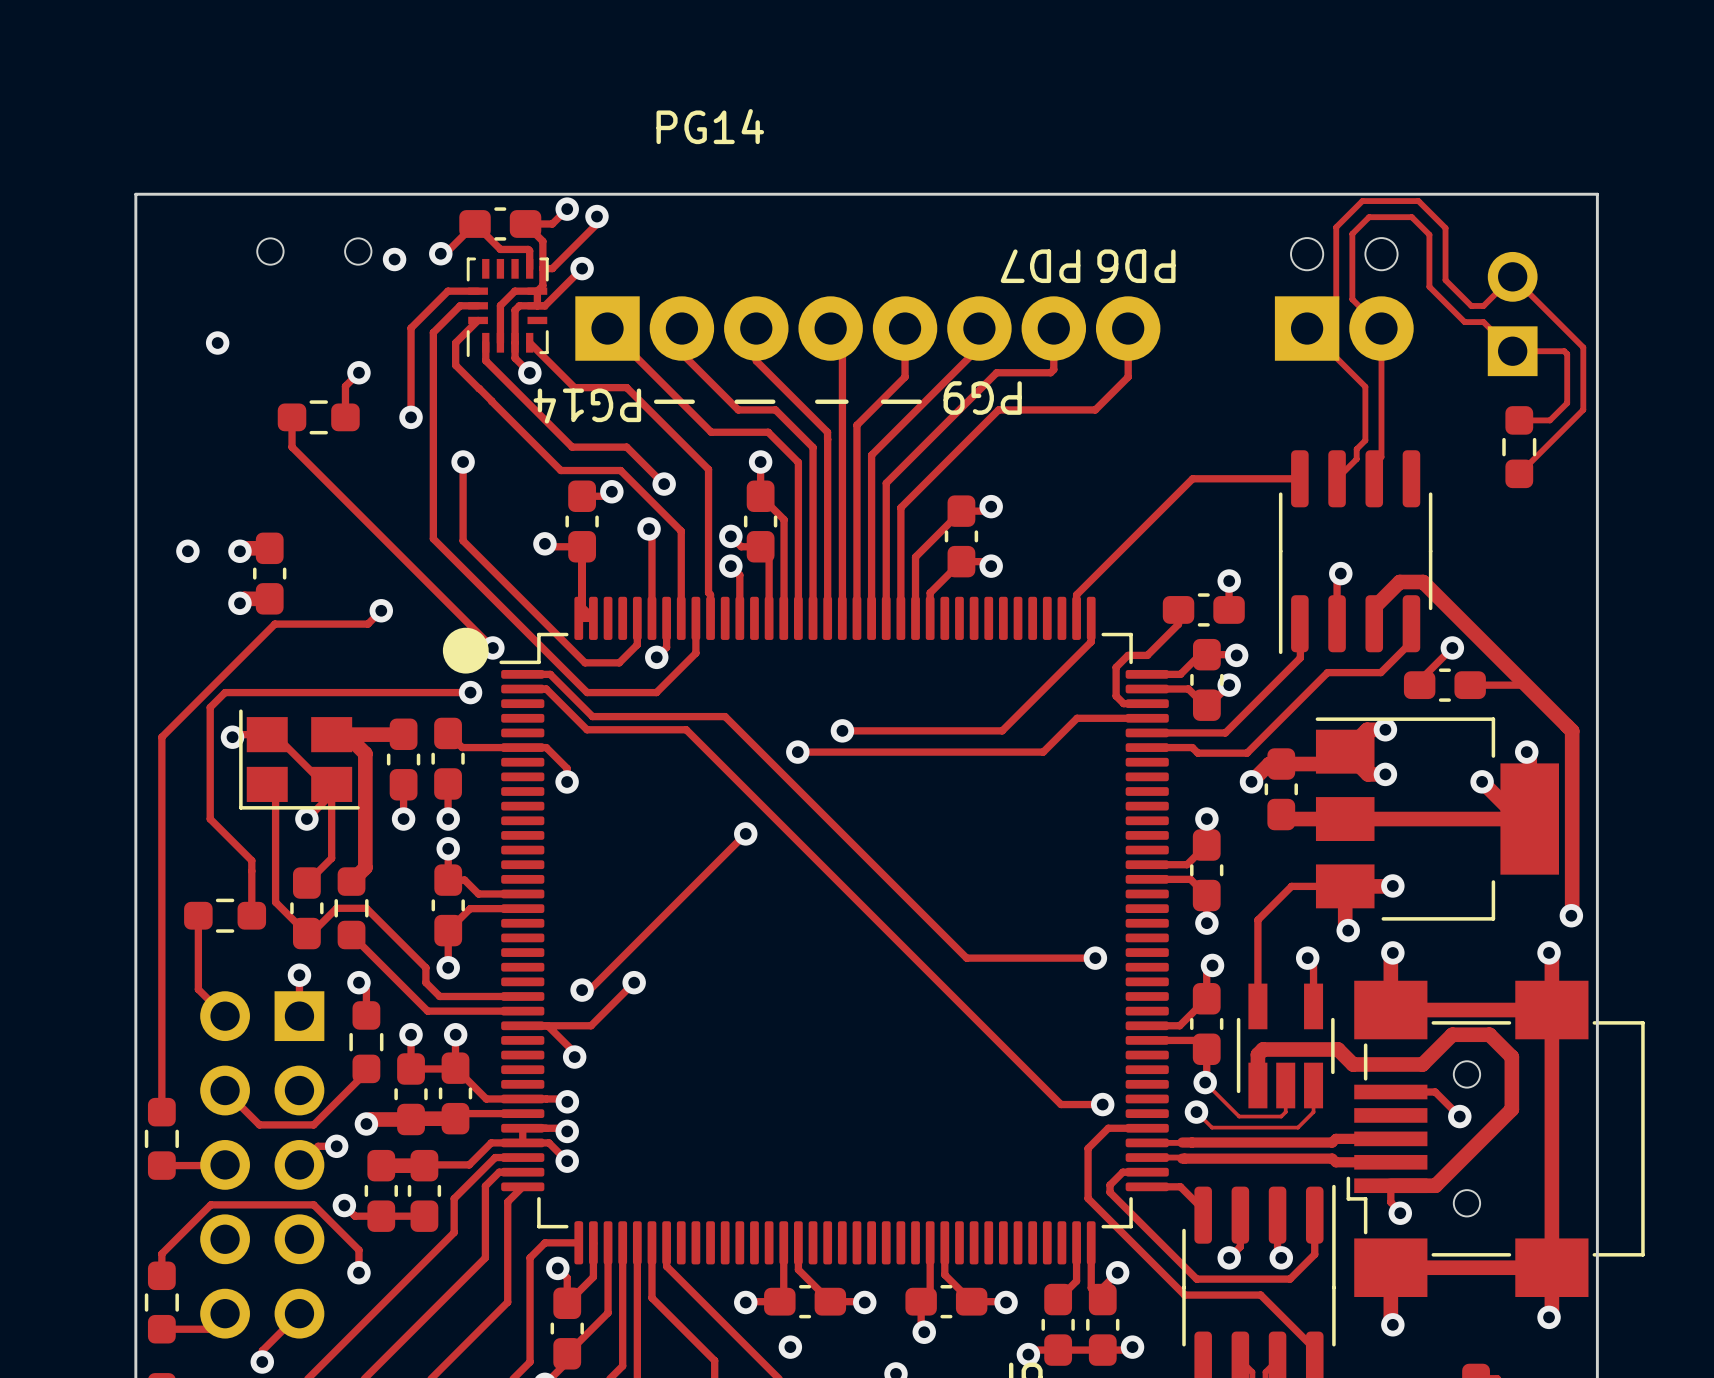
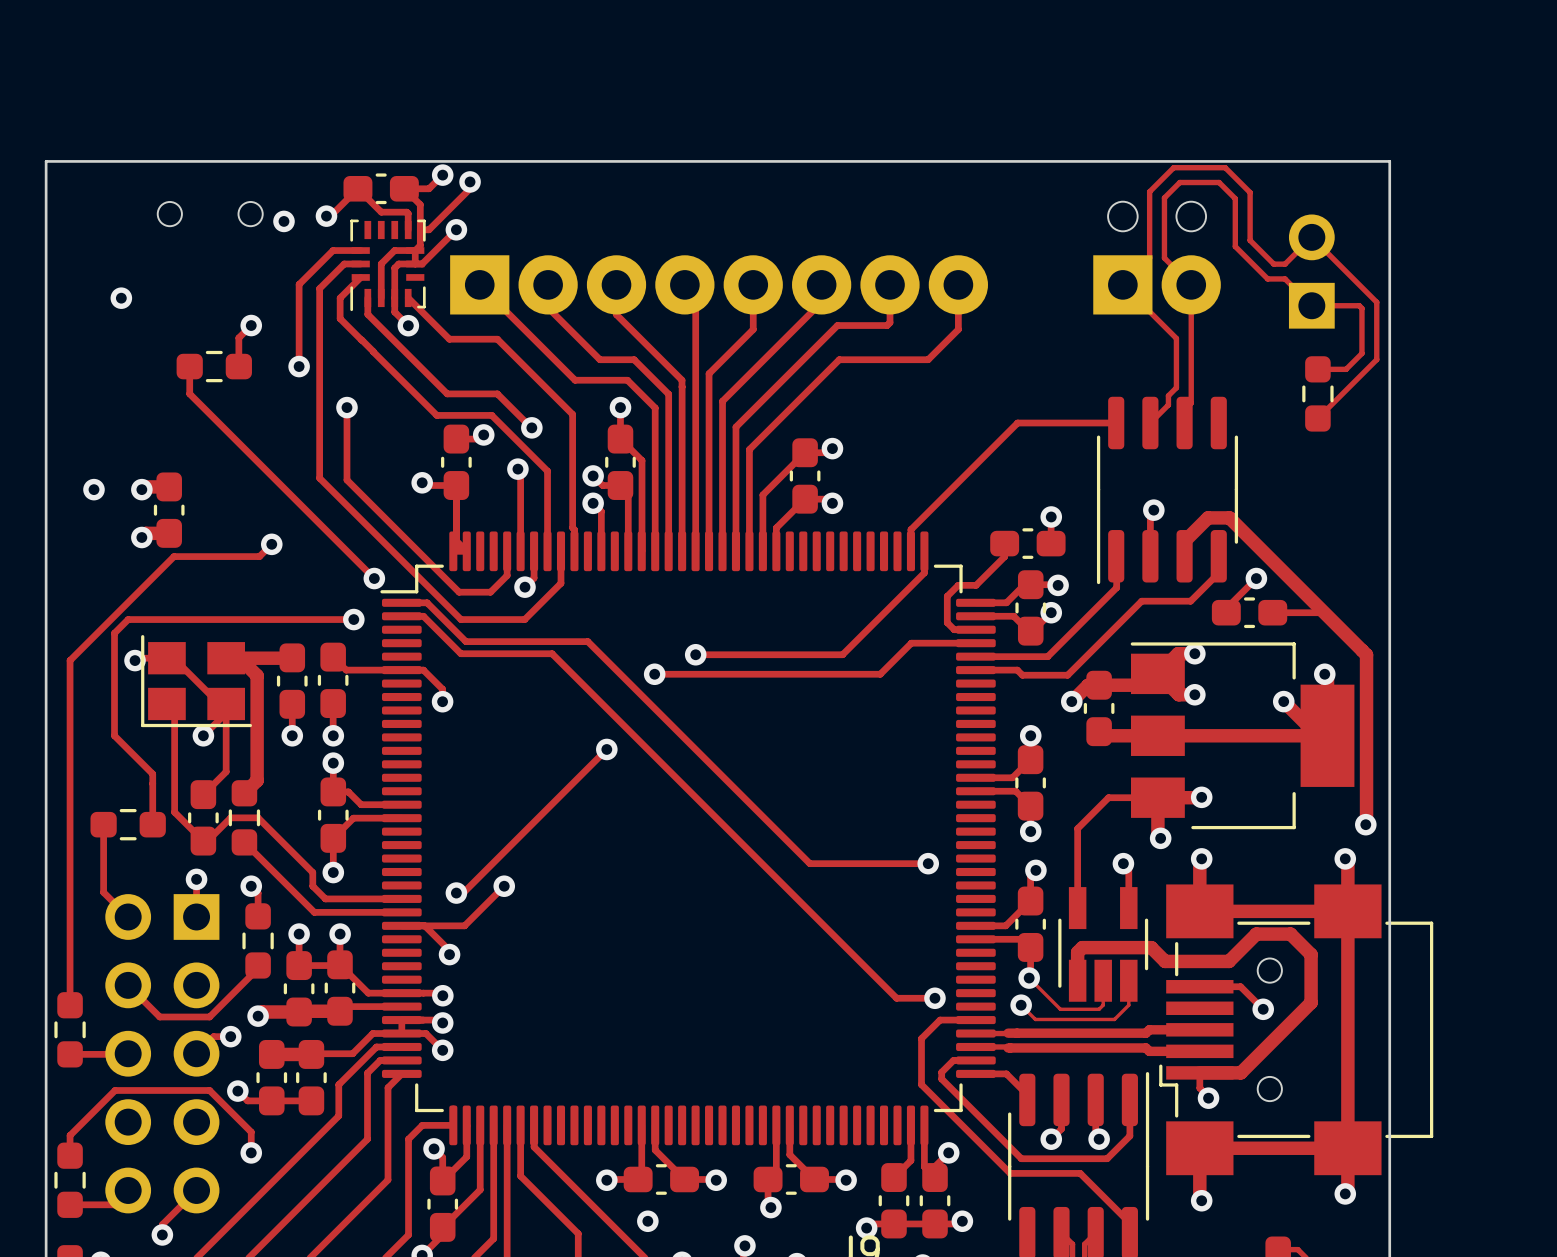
text: PG14 (710, 126) -> none
text: PD7 (1040, 266) -> none
text: PD6 (1136, 266) -> none
text: PG9 (982, 398) -> none
line: (656, 401) (692, 401) -> none
line: (736, 401) (773, 401) -> none
line: (817, 401) (846, 401) -> none
line: (883, 401) (919, 401) -> none
text: PG14 (587, 406) -> none
drawing: [442, 627, 489, 674] -> none

